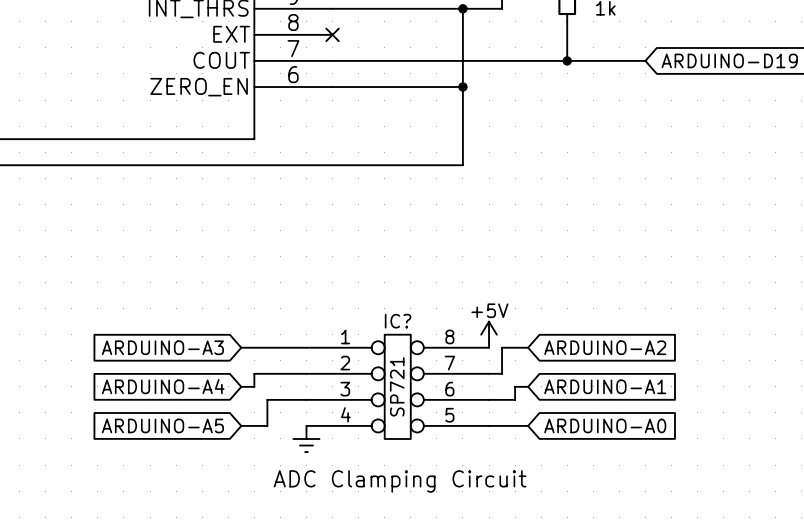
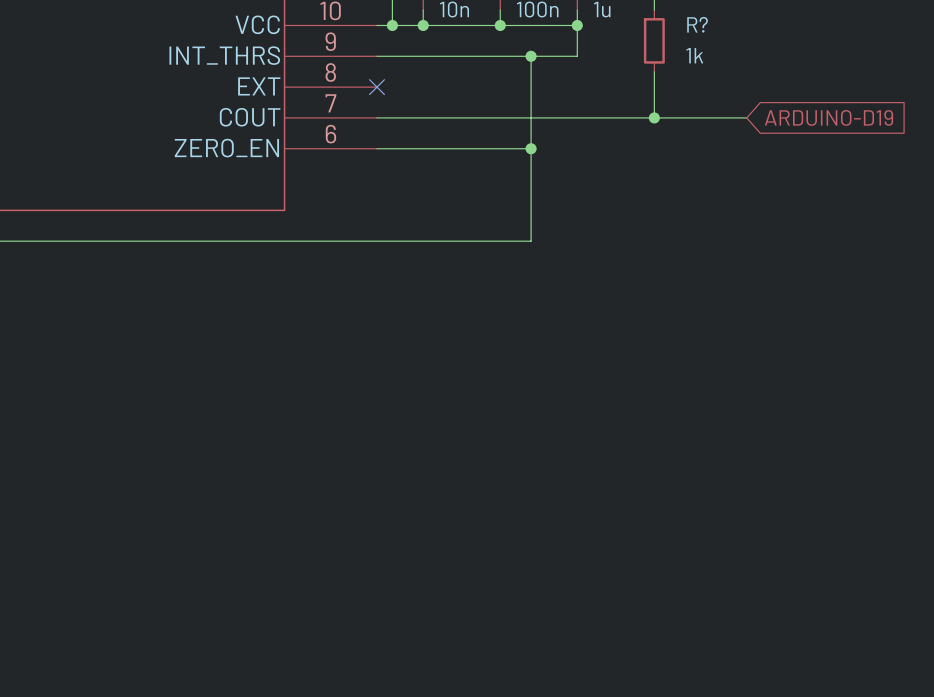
power symbol: +5V (489, 334) -> none
global label: ARDUINO-A3 (162, 347) -> none
wire: (241, 347) (306, 347) -> none
wire: (528, 347) (502, 347) (502, 373) (489, 373) -> none
global label: ARDUINO-A2 (605, 347) -> none
wire: (306, 373) (254, 373) (254, 386) (241, 386) -> none
global label: ARDUINO-A4 (163, 386) -> none
IC?: SP721 (397, 386) -> none
wire: (528, 386) (515, 386) (515, 399) (489, 399) -> none
global label: ARDUINO-A1 (605, 386) -> none
wire: (306, 399) (267, 399) (267, 425) (241, 425) -> none
global label: ARDUINO-A5 (162, 425) -> none
wire: (489, 425) (528, 425) -> none
global label: ARDUINO-A0 (605, 425) -> none
power symbol: (306, 438) -> none
text: ADC Clamping Circuit (400, 481) -> none

